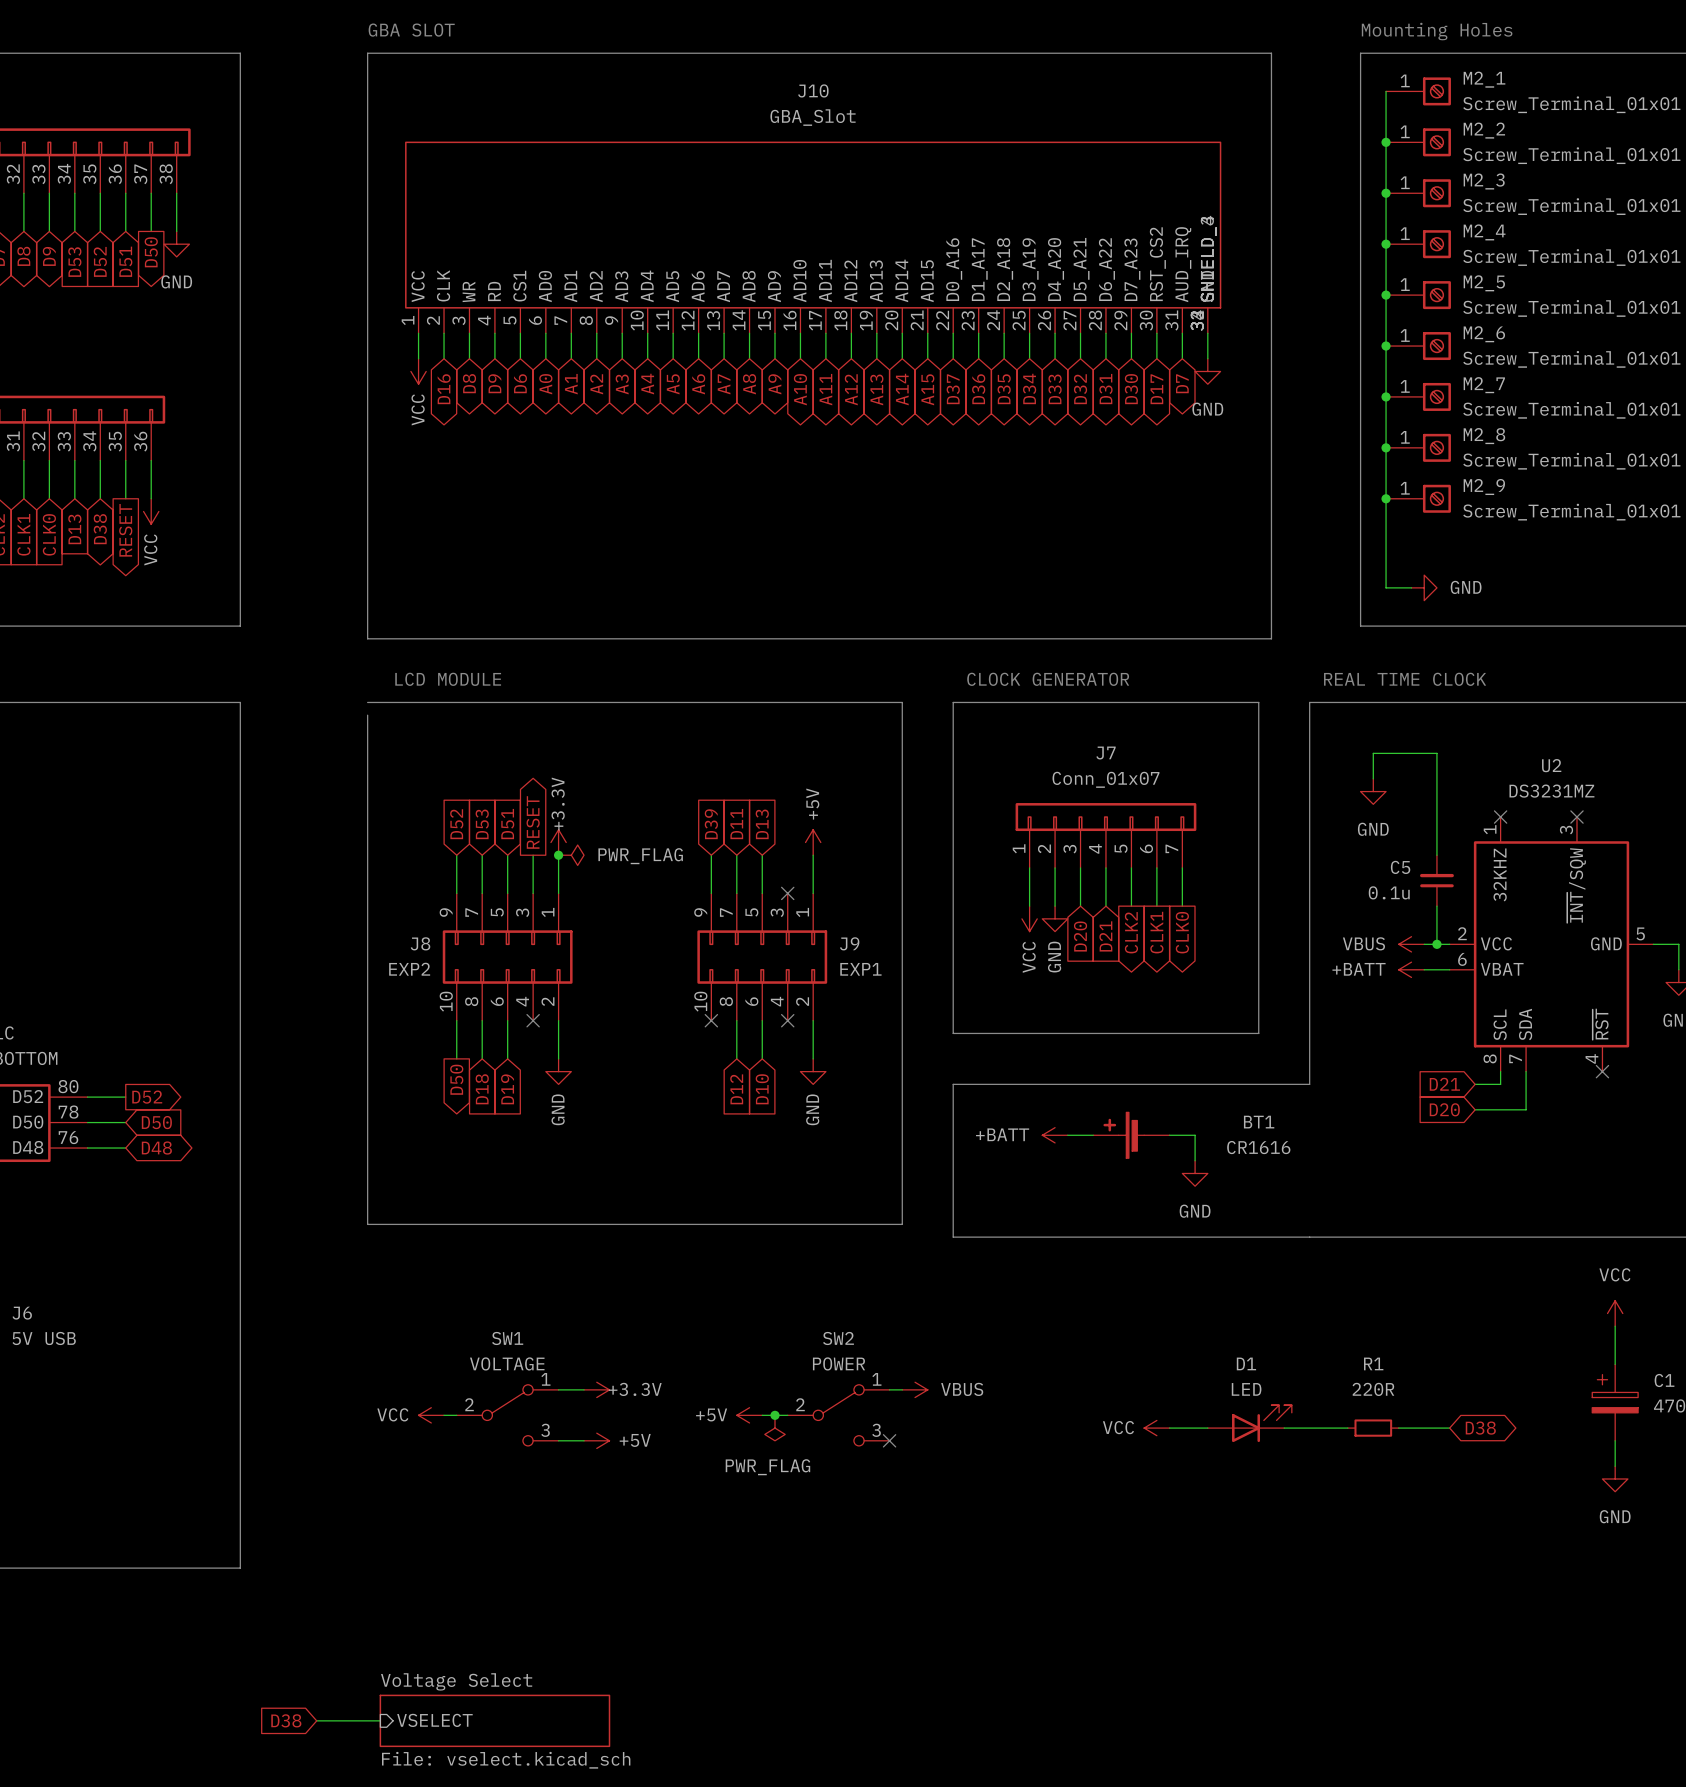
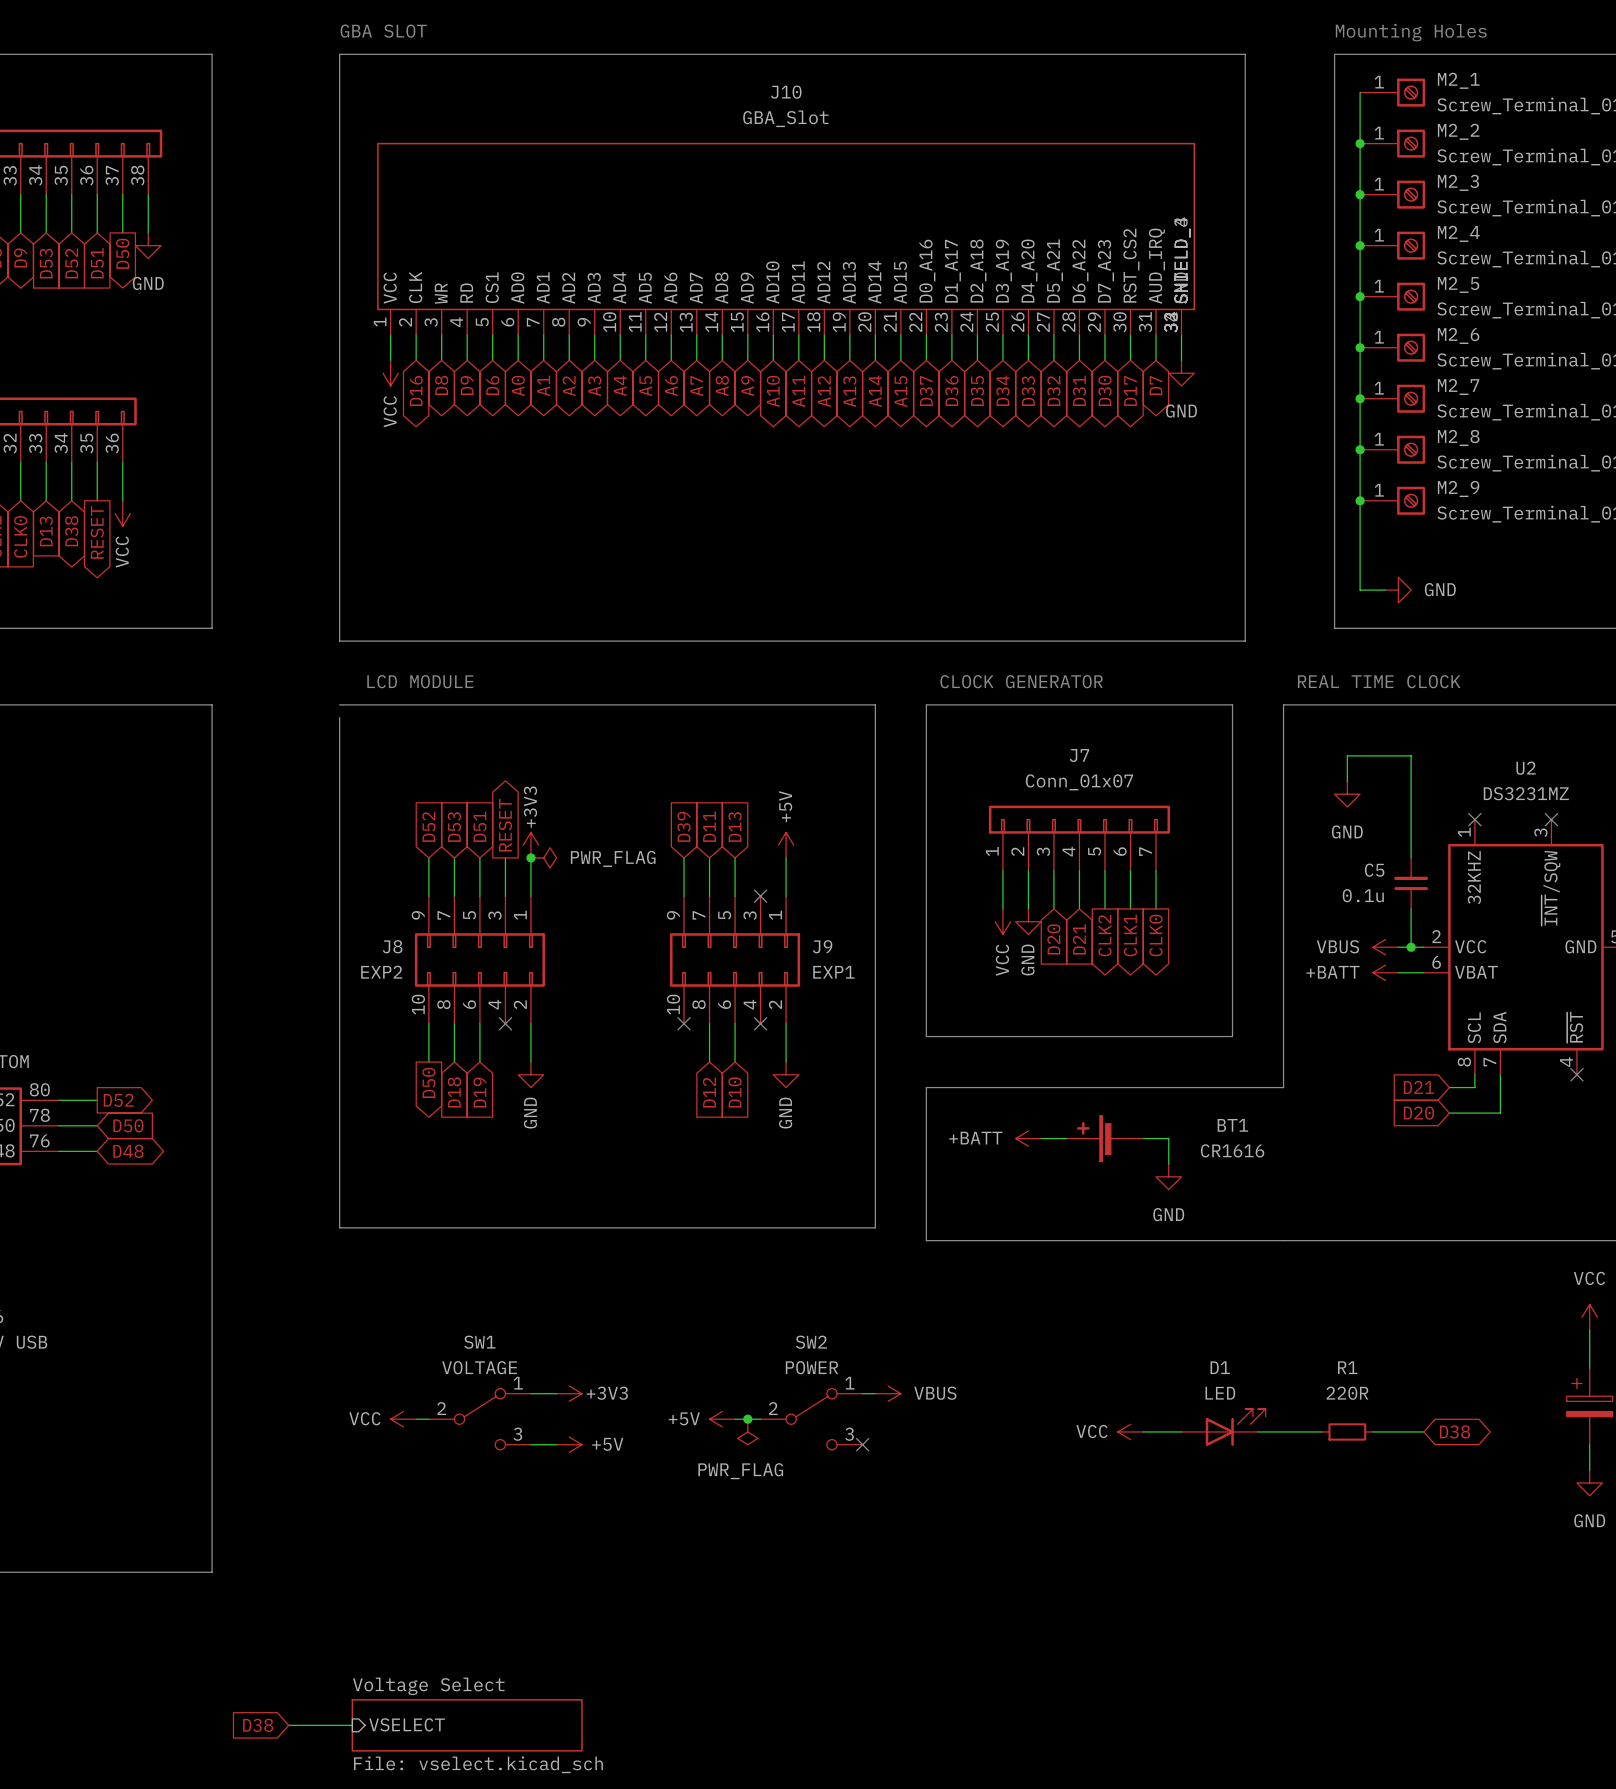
power symbol: +3.3V (558, 842) -> +3V3 (530, 845)
power symbol: +3.3V (596, 1389) -> +3V3 (569, 1393)

